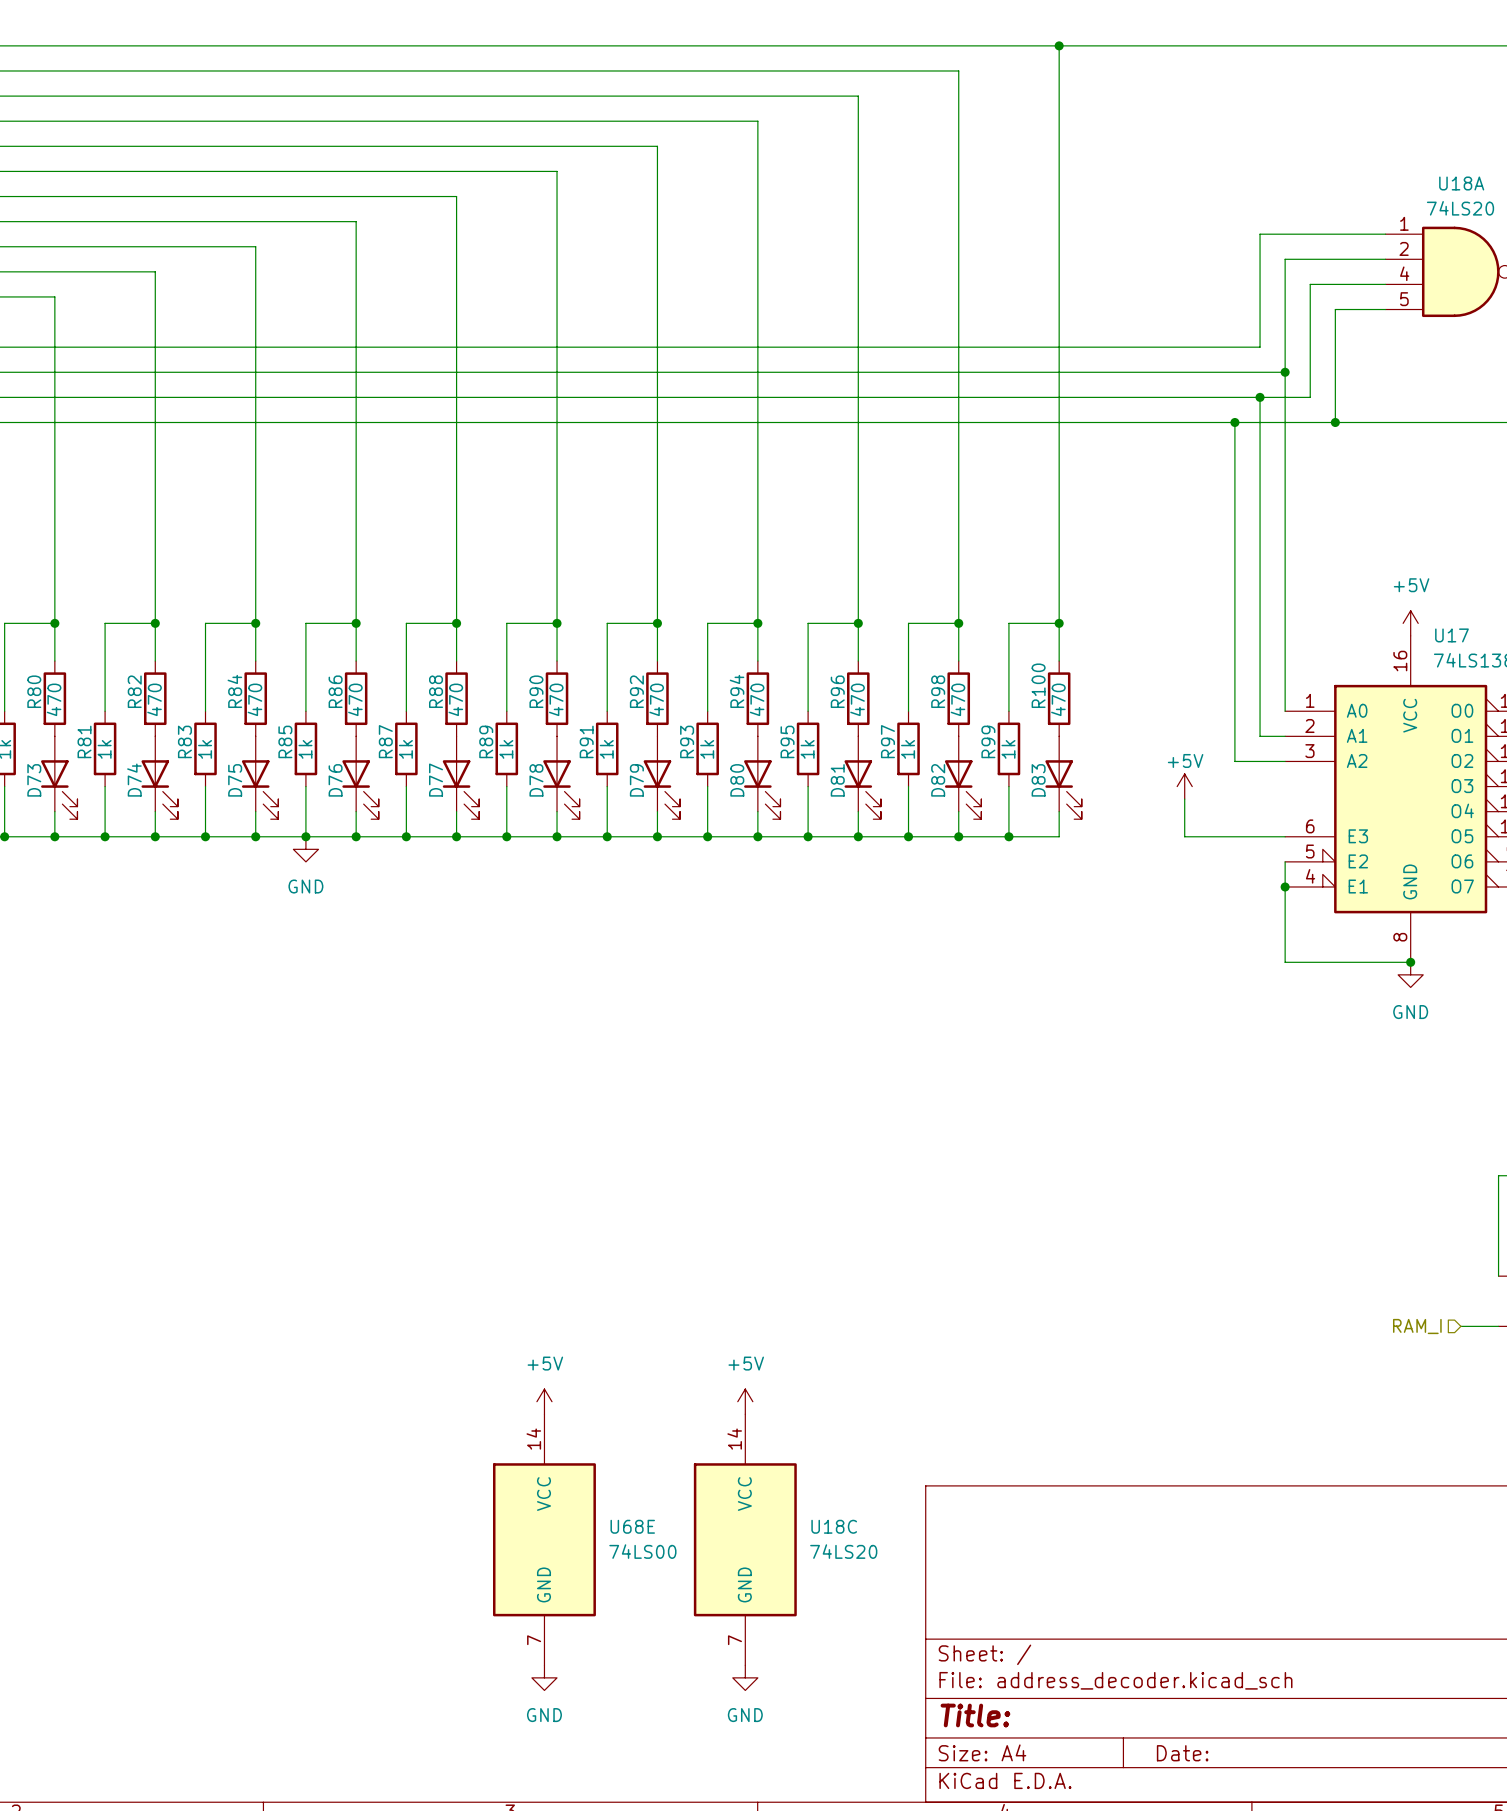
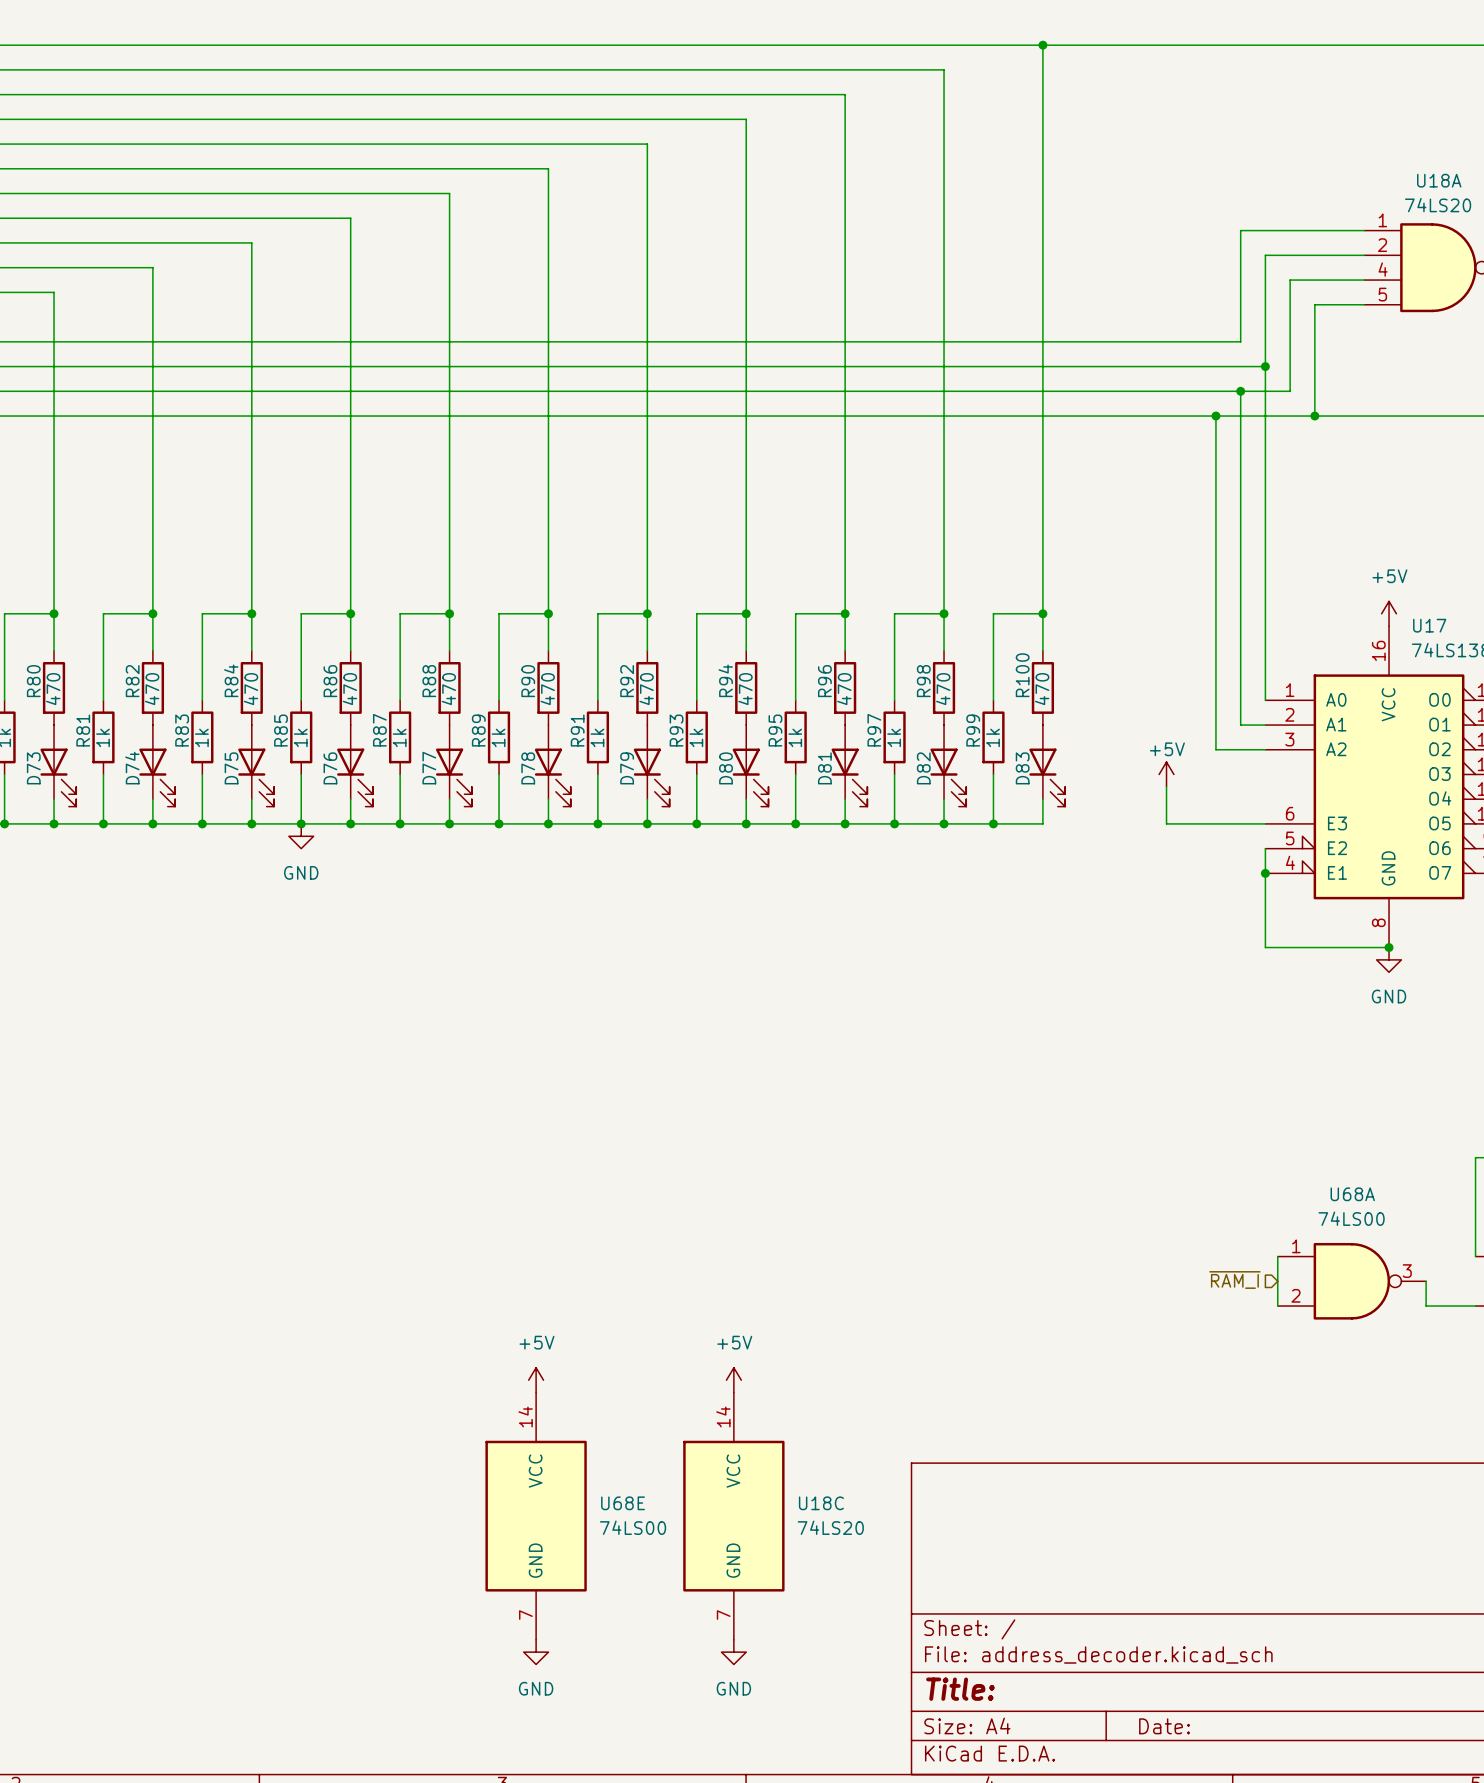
wire: none -> (1277, 1256) (1277, 1306)
hierarchical label: none -> ~{RAM_I} (1234, 1280)
U68A: none -> 74LS00 (1351, 1281)
wire: none -> (1426, 1281) (1426, 1306) (1438, 1306)
hierarchical label: RAM_I (1417, 1326) -> none

